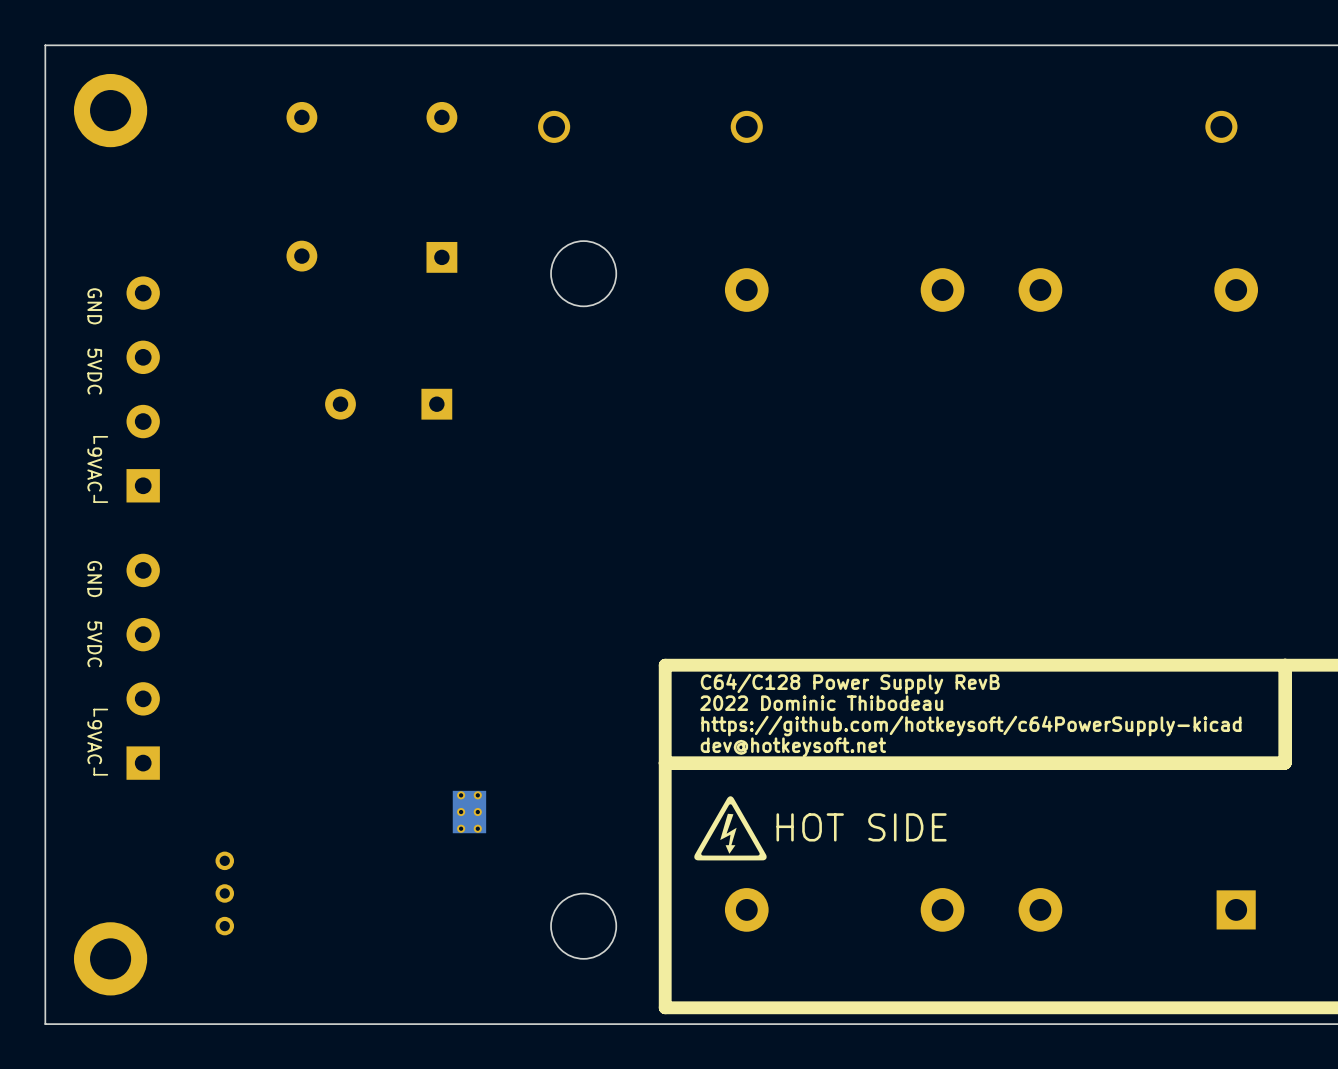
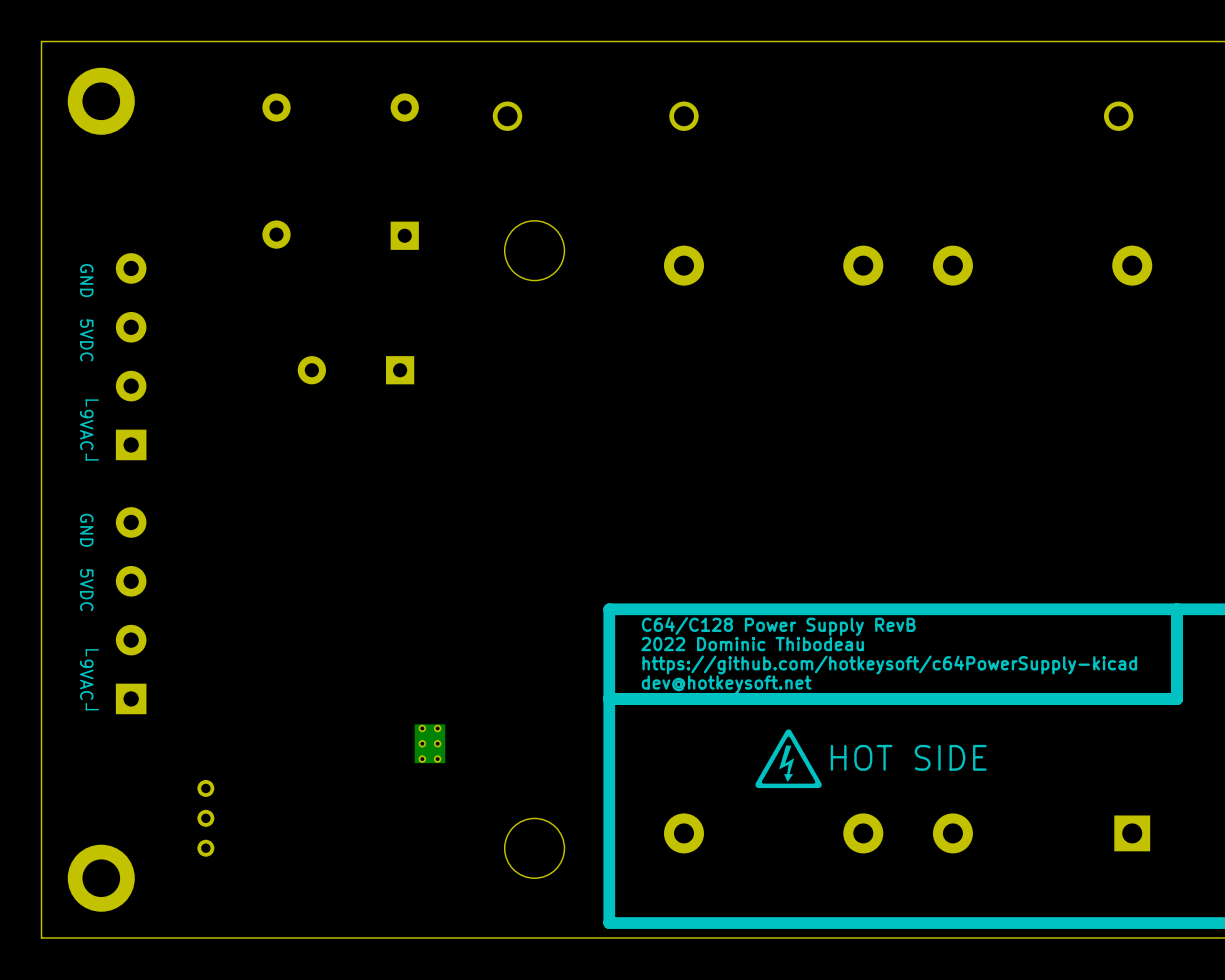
text position: HOT SIDE (861, 827) -> HOT SIDE (908, 757)
drawing position: (730, 828) -> (788, 758)

